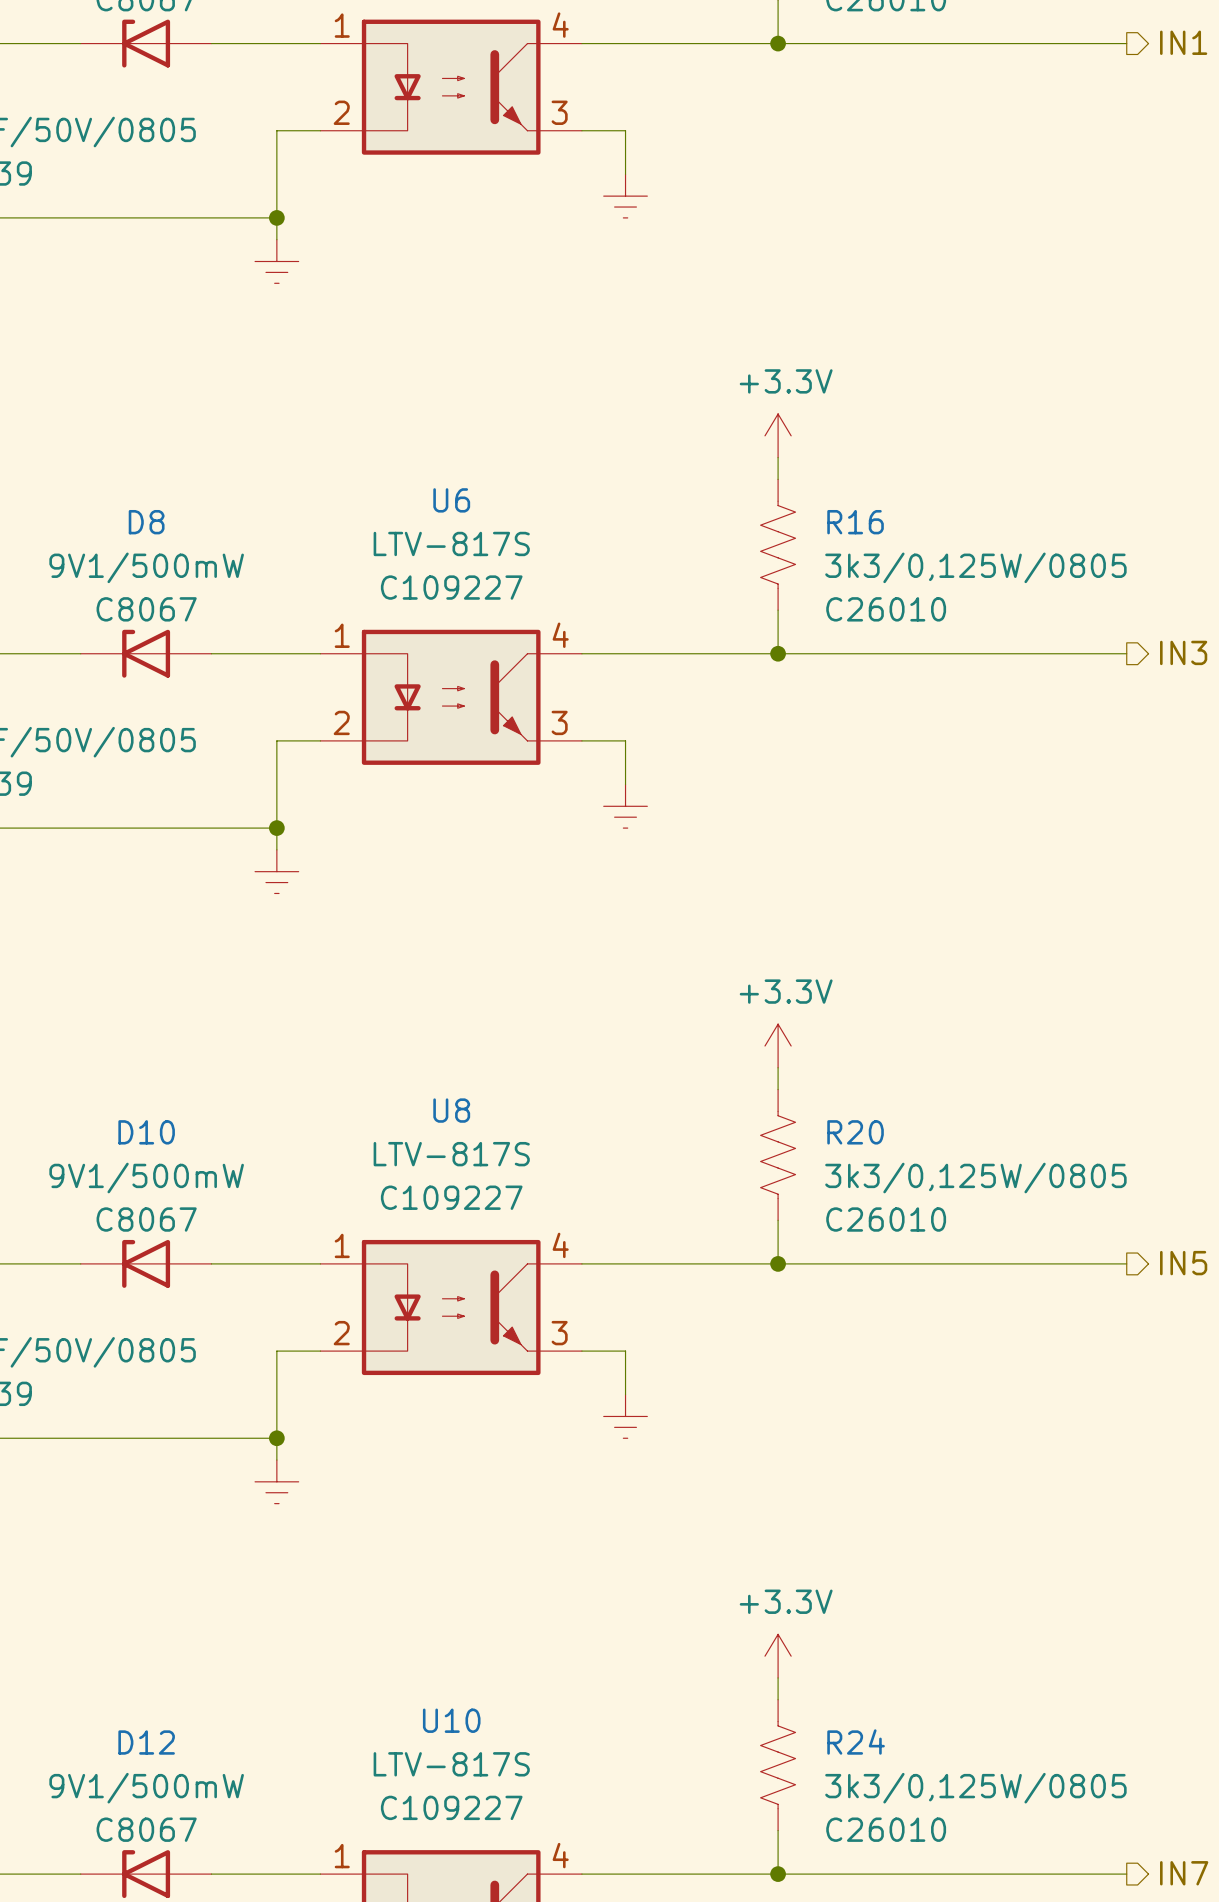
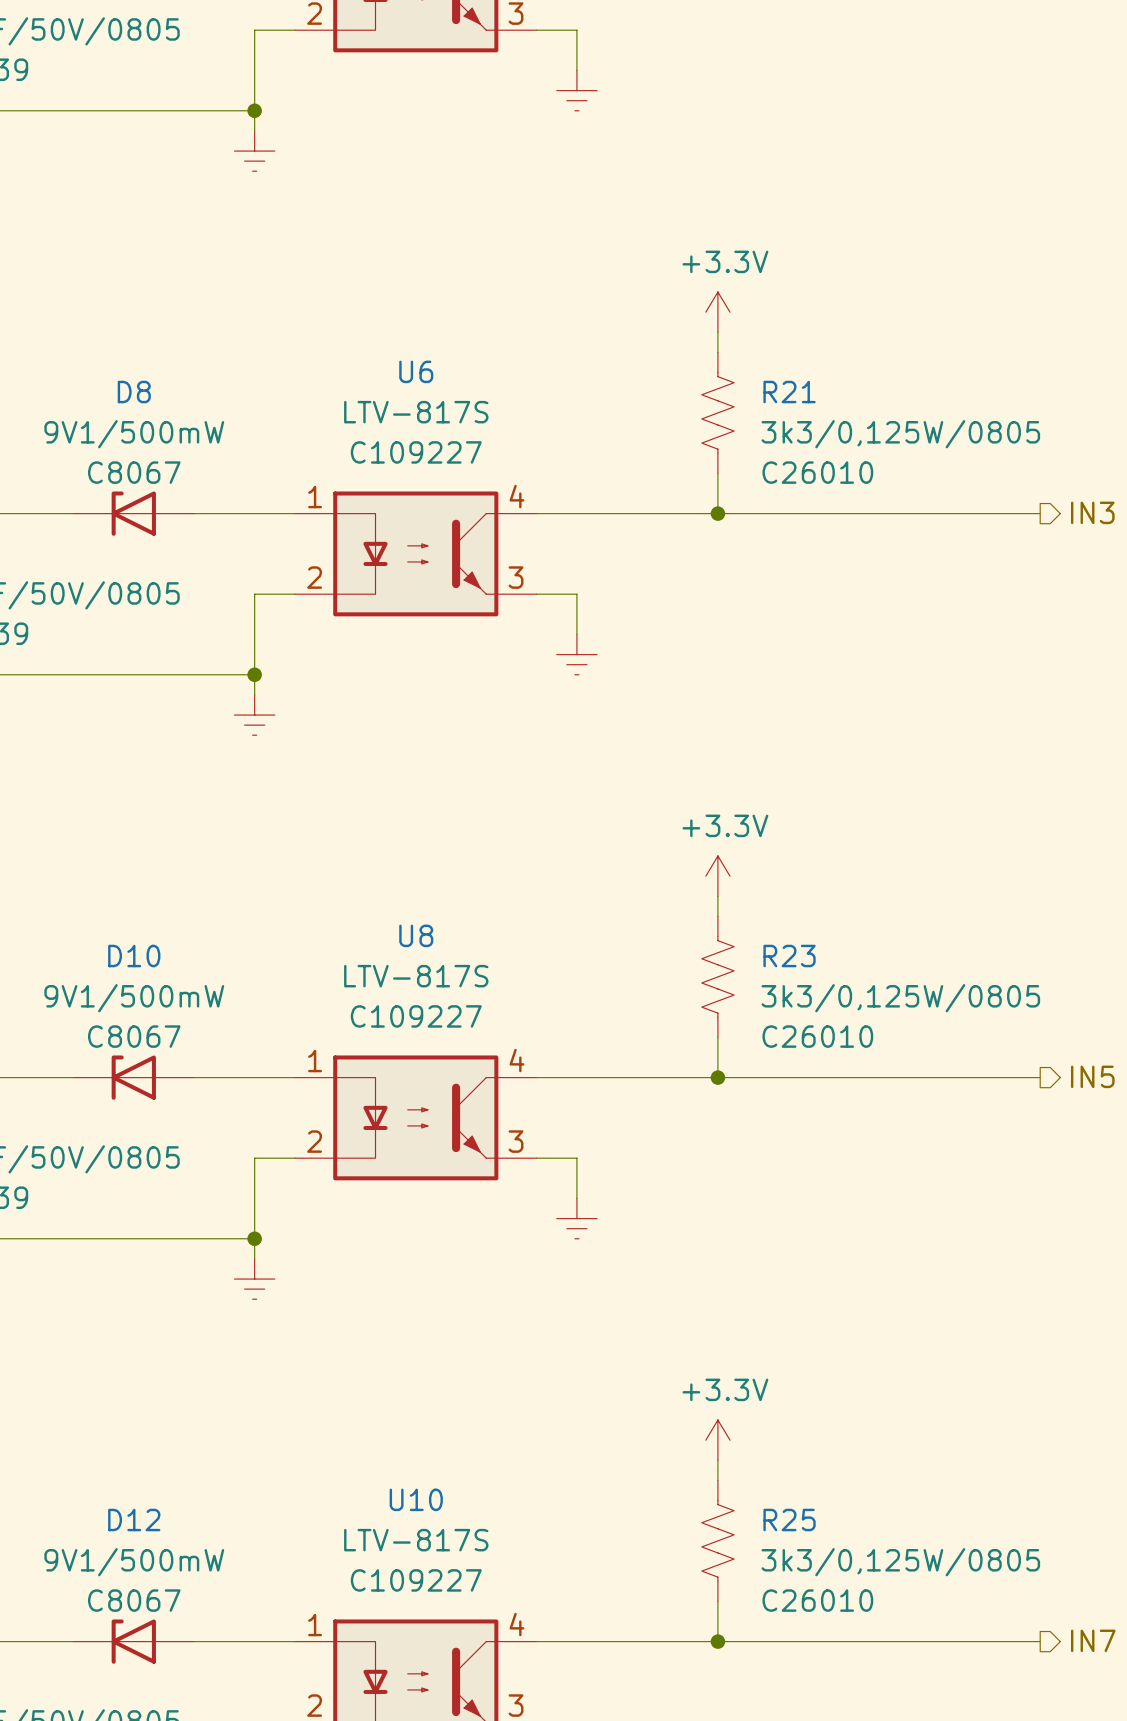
R16 name: R16 (855, 522) -> R21 (789, 392)
R20 name: R20 (855, 1132) -> R23 (789, 956)
R24 name: R24 (856, 1742) -> R25 (789, 1520)

